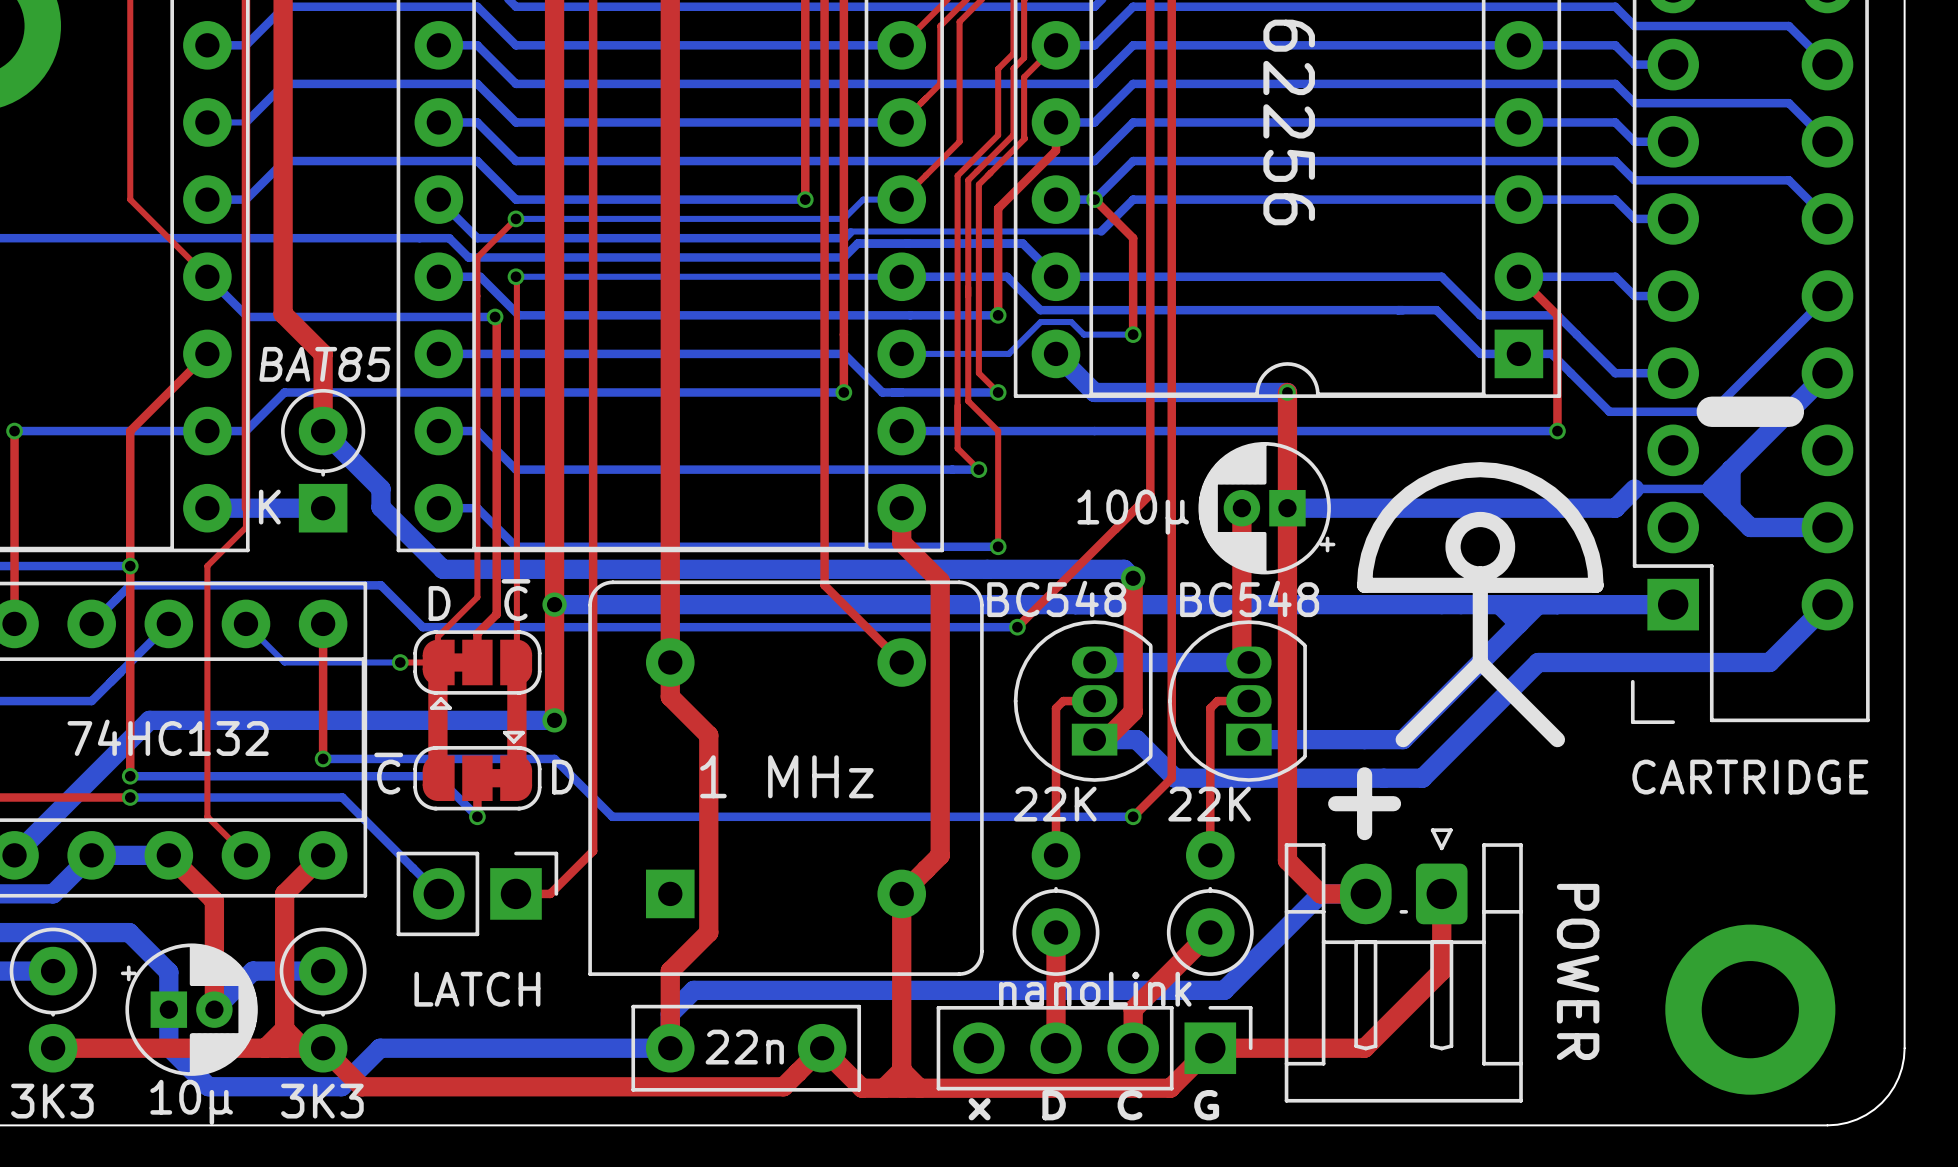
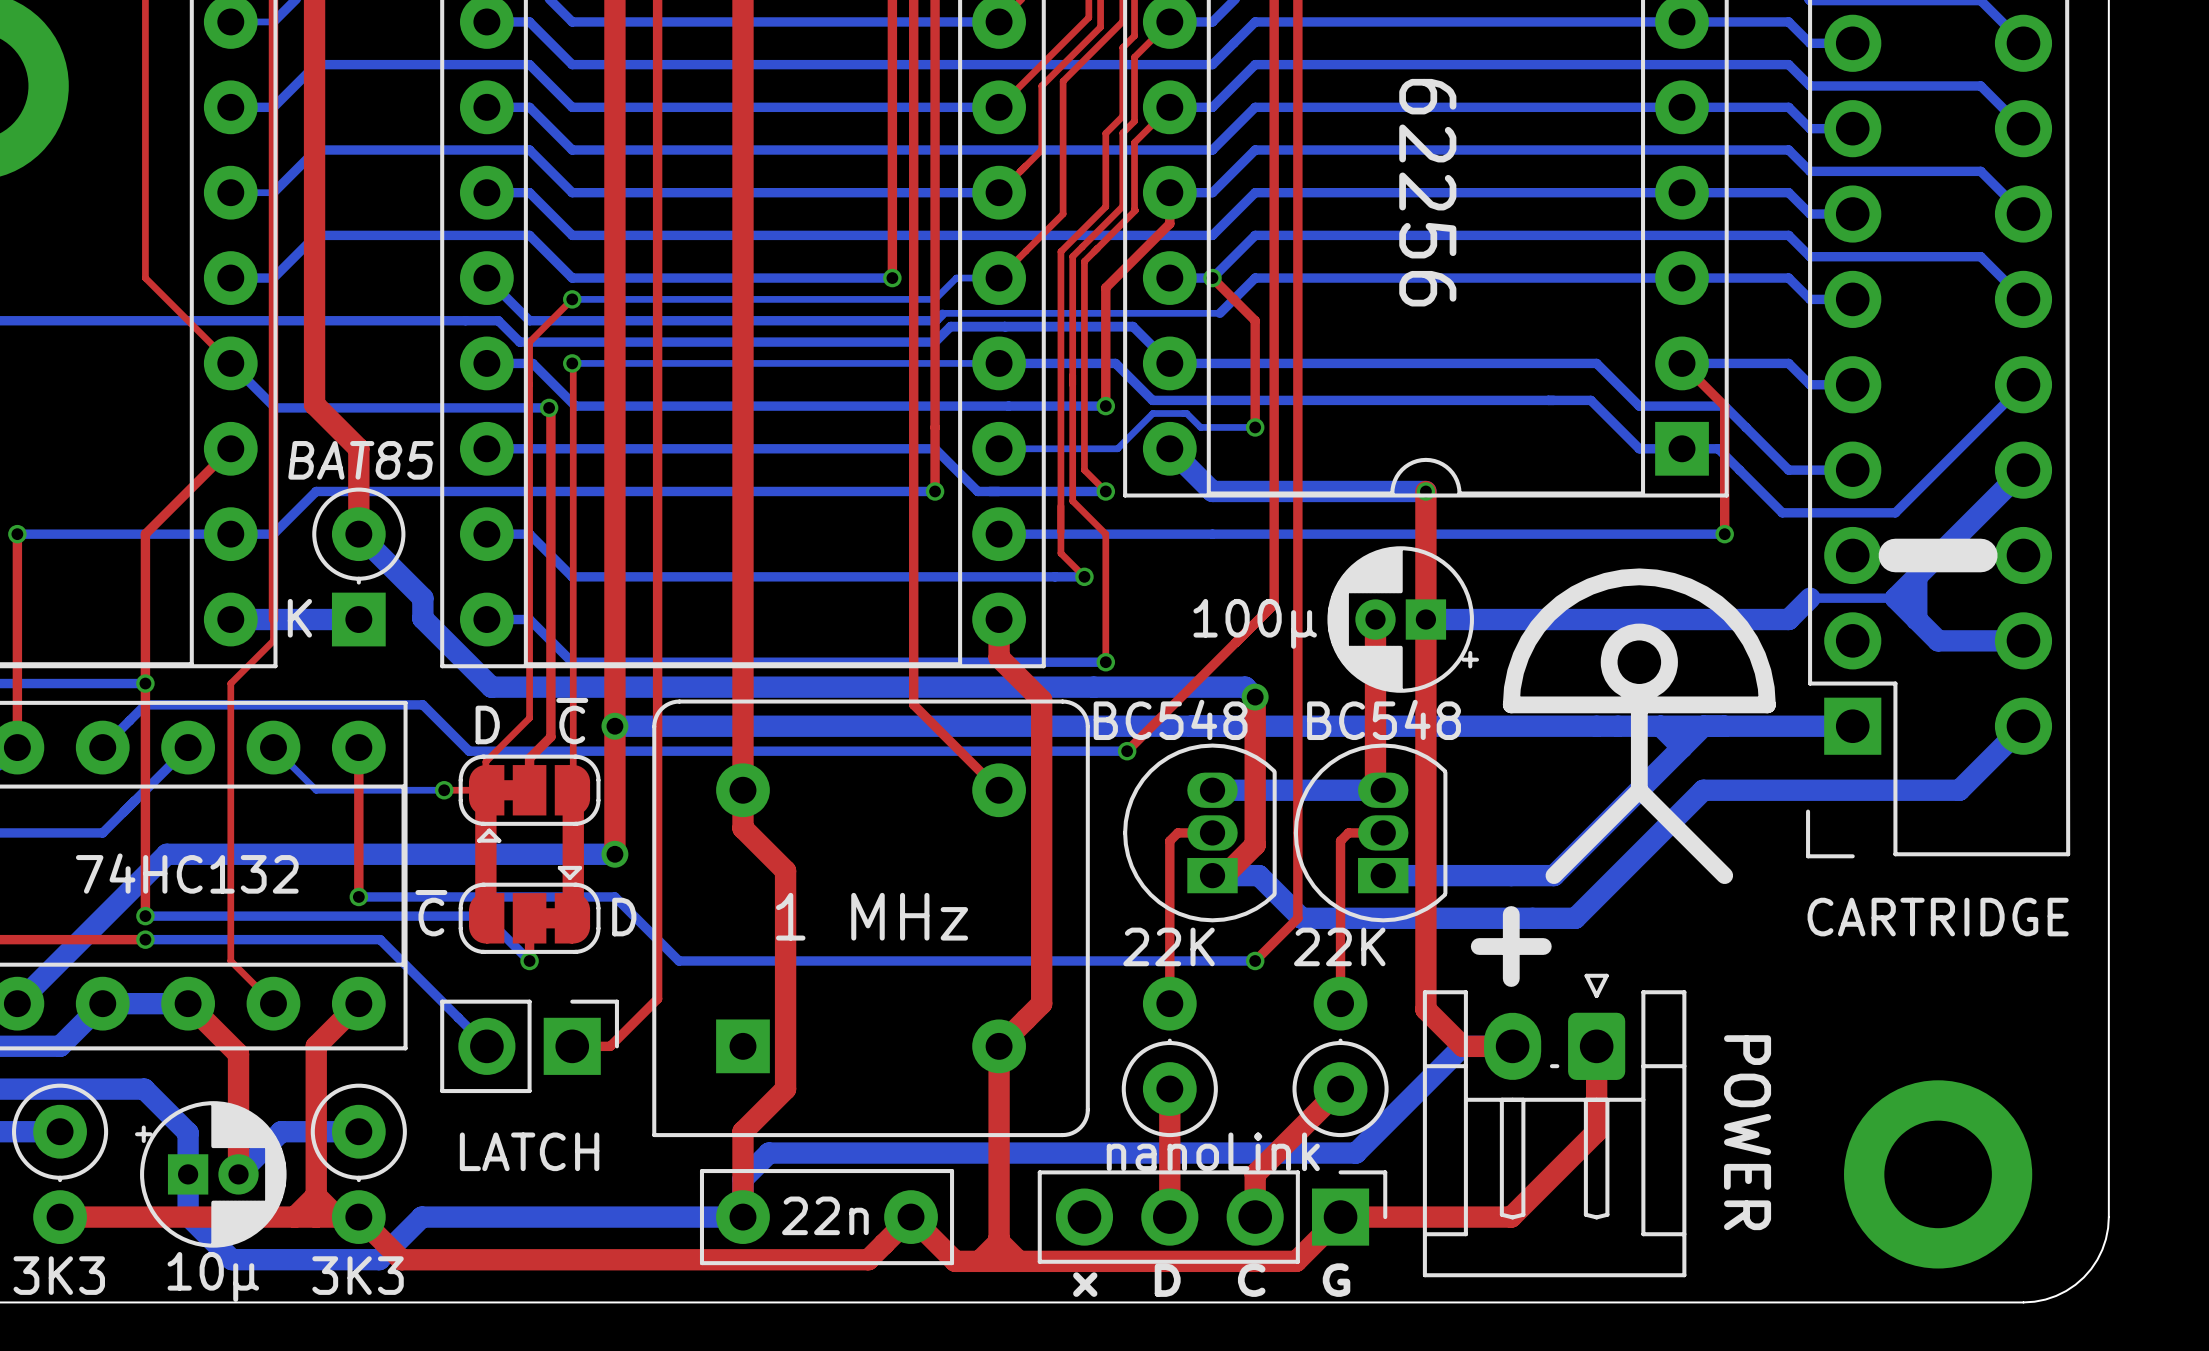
line: (1711, 411) (1788, 411) -> (1895, 555) (1980, 555)

